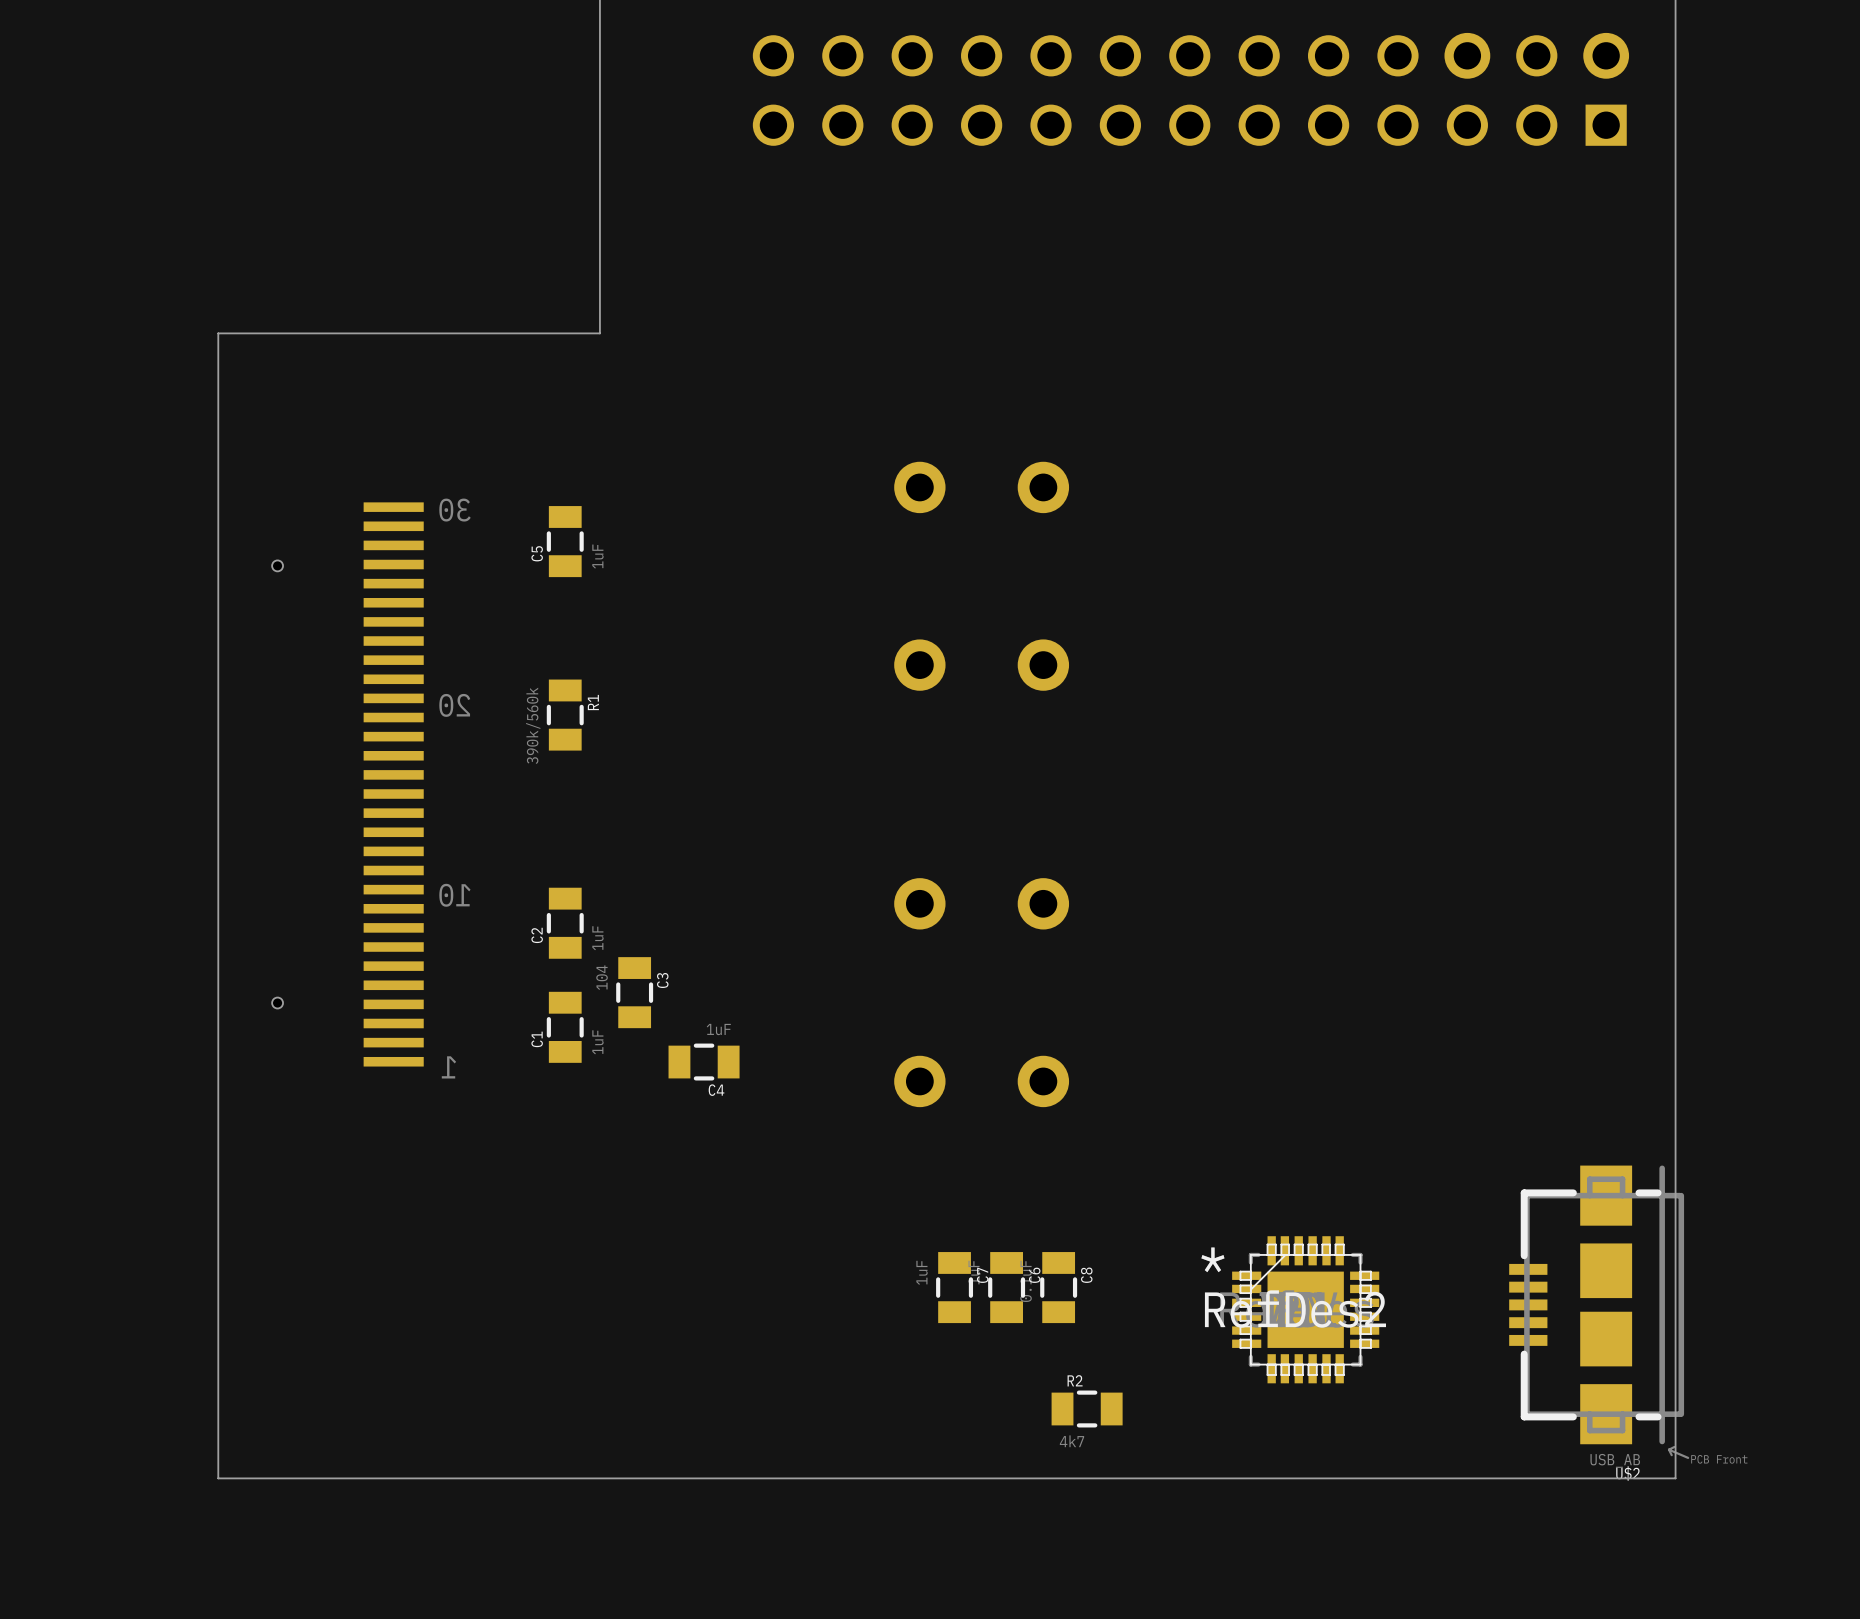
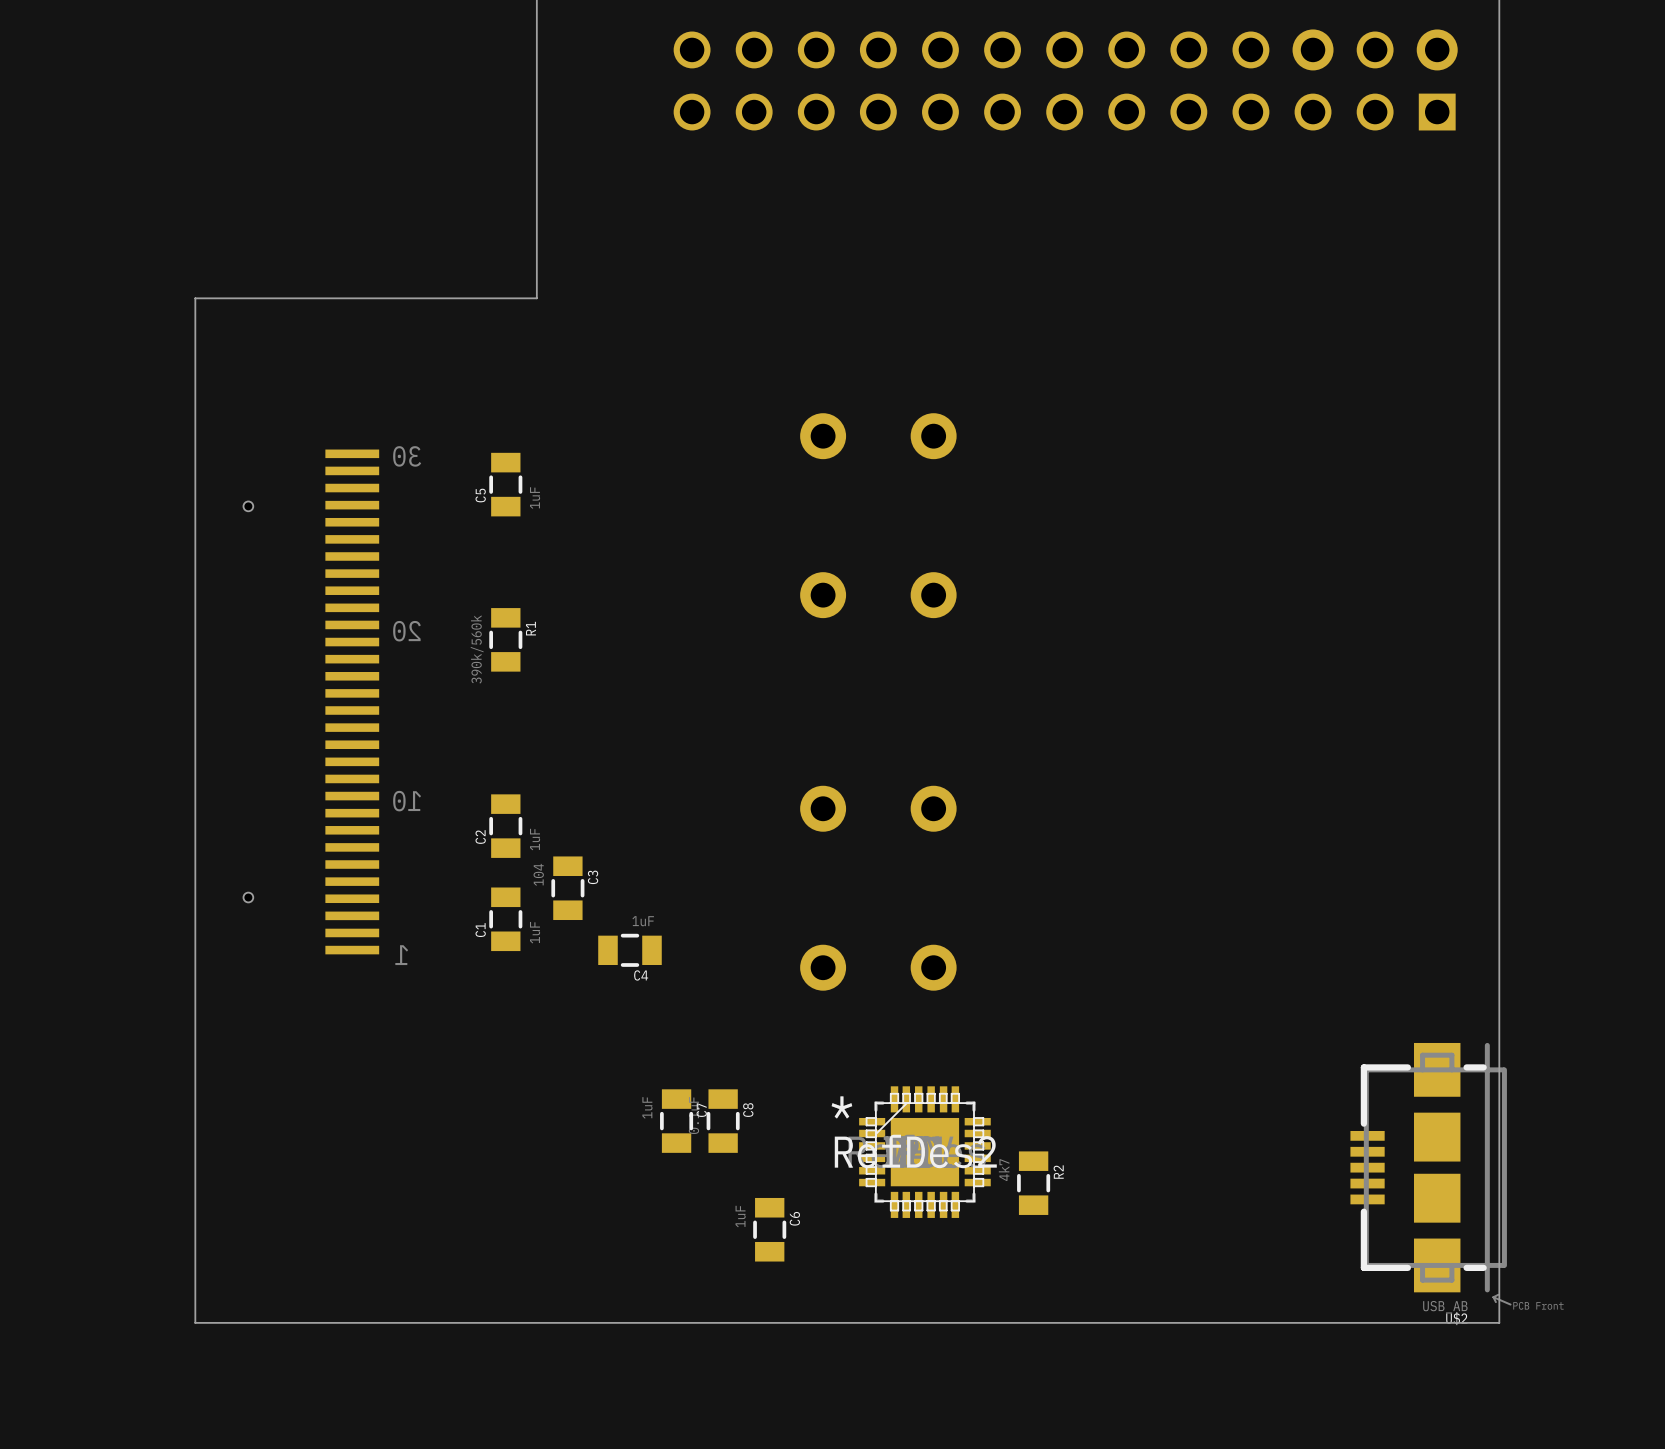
C7 position: (954, 1287) -> (676, 1121)
C6 position: (1006, 1287) -> (769, 1229)
C8 position: (1058, 1287) -> (723, 1121)
part position: (1305, 1309) -> (924, 1152)
R2 rotation: 0° (1087, 1409) -> 90° clockwise (1033, 1183)
R2 position: (1087, 1409) -> (1033, 1183)

